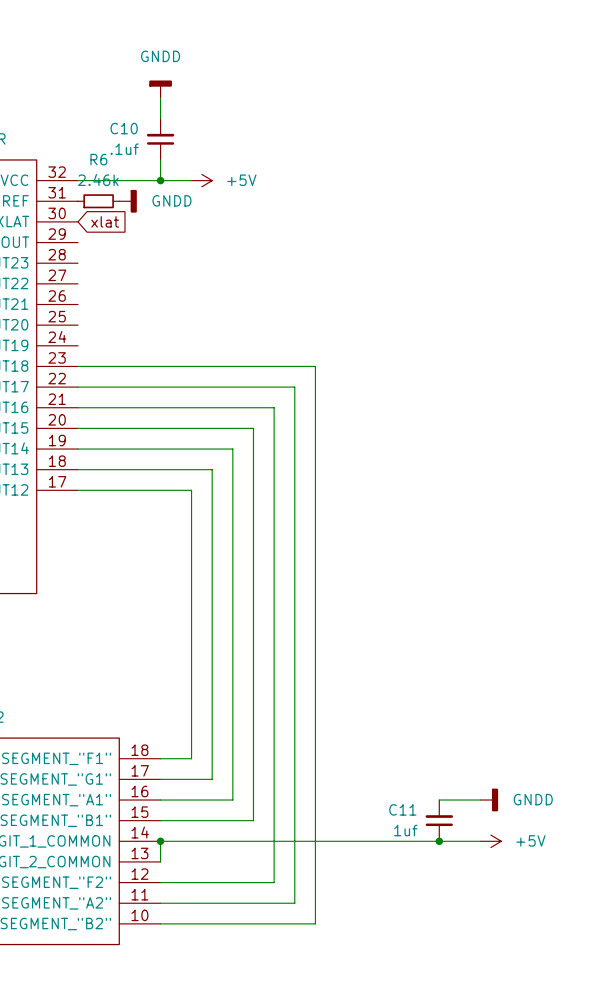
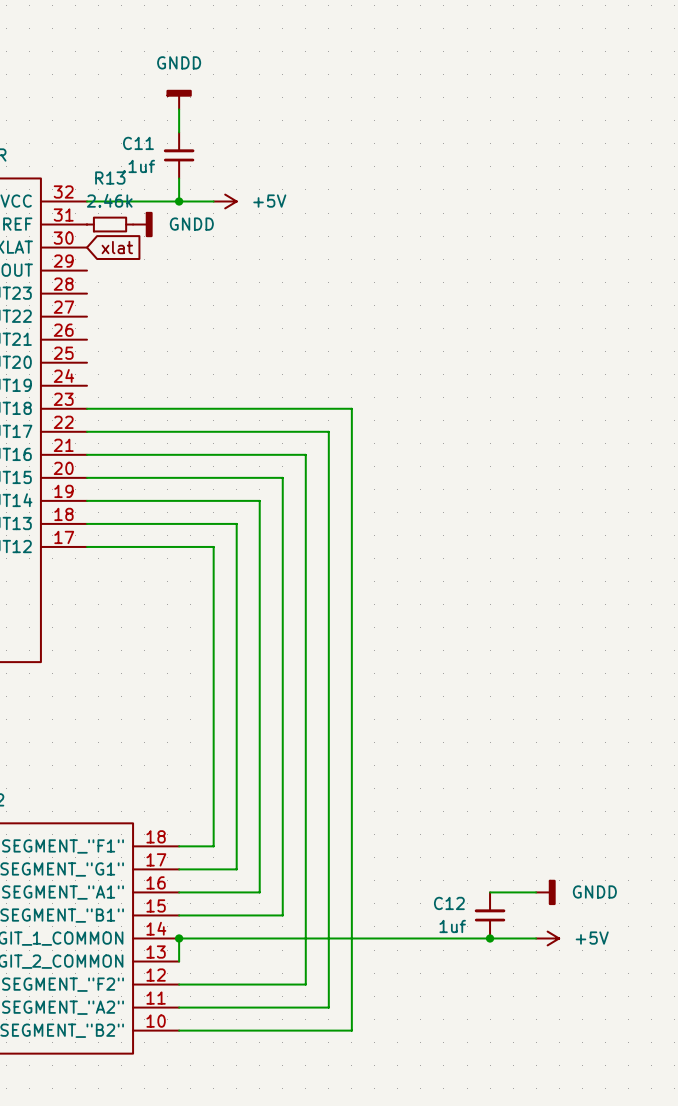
C10 name: C10 (124, 128) -> C11 (138, 143)
R6 name: R6 (98, 159) -> R13 (110, 178)
C11 name: C11 (402, 809) -> C12 (449, 903)

